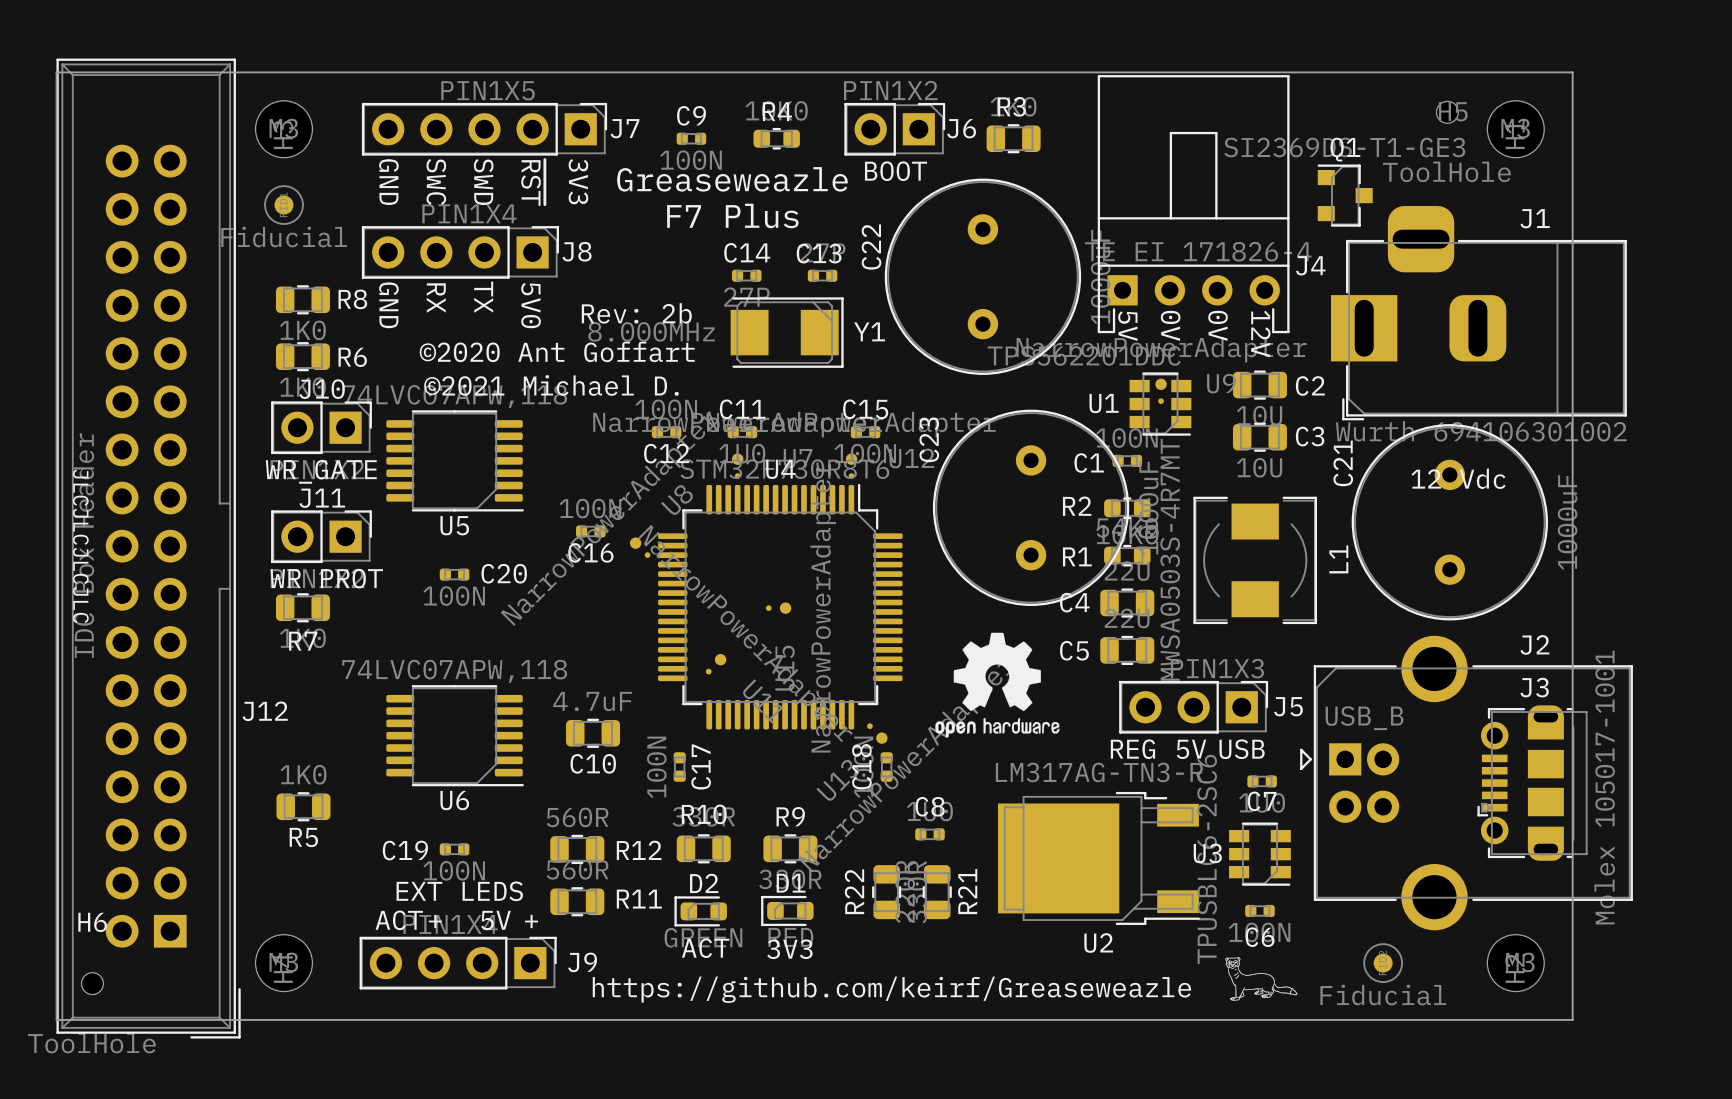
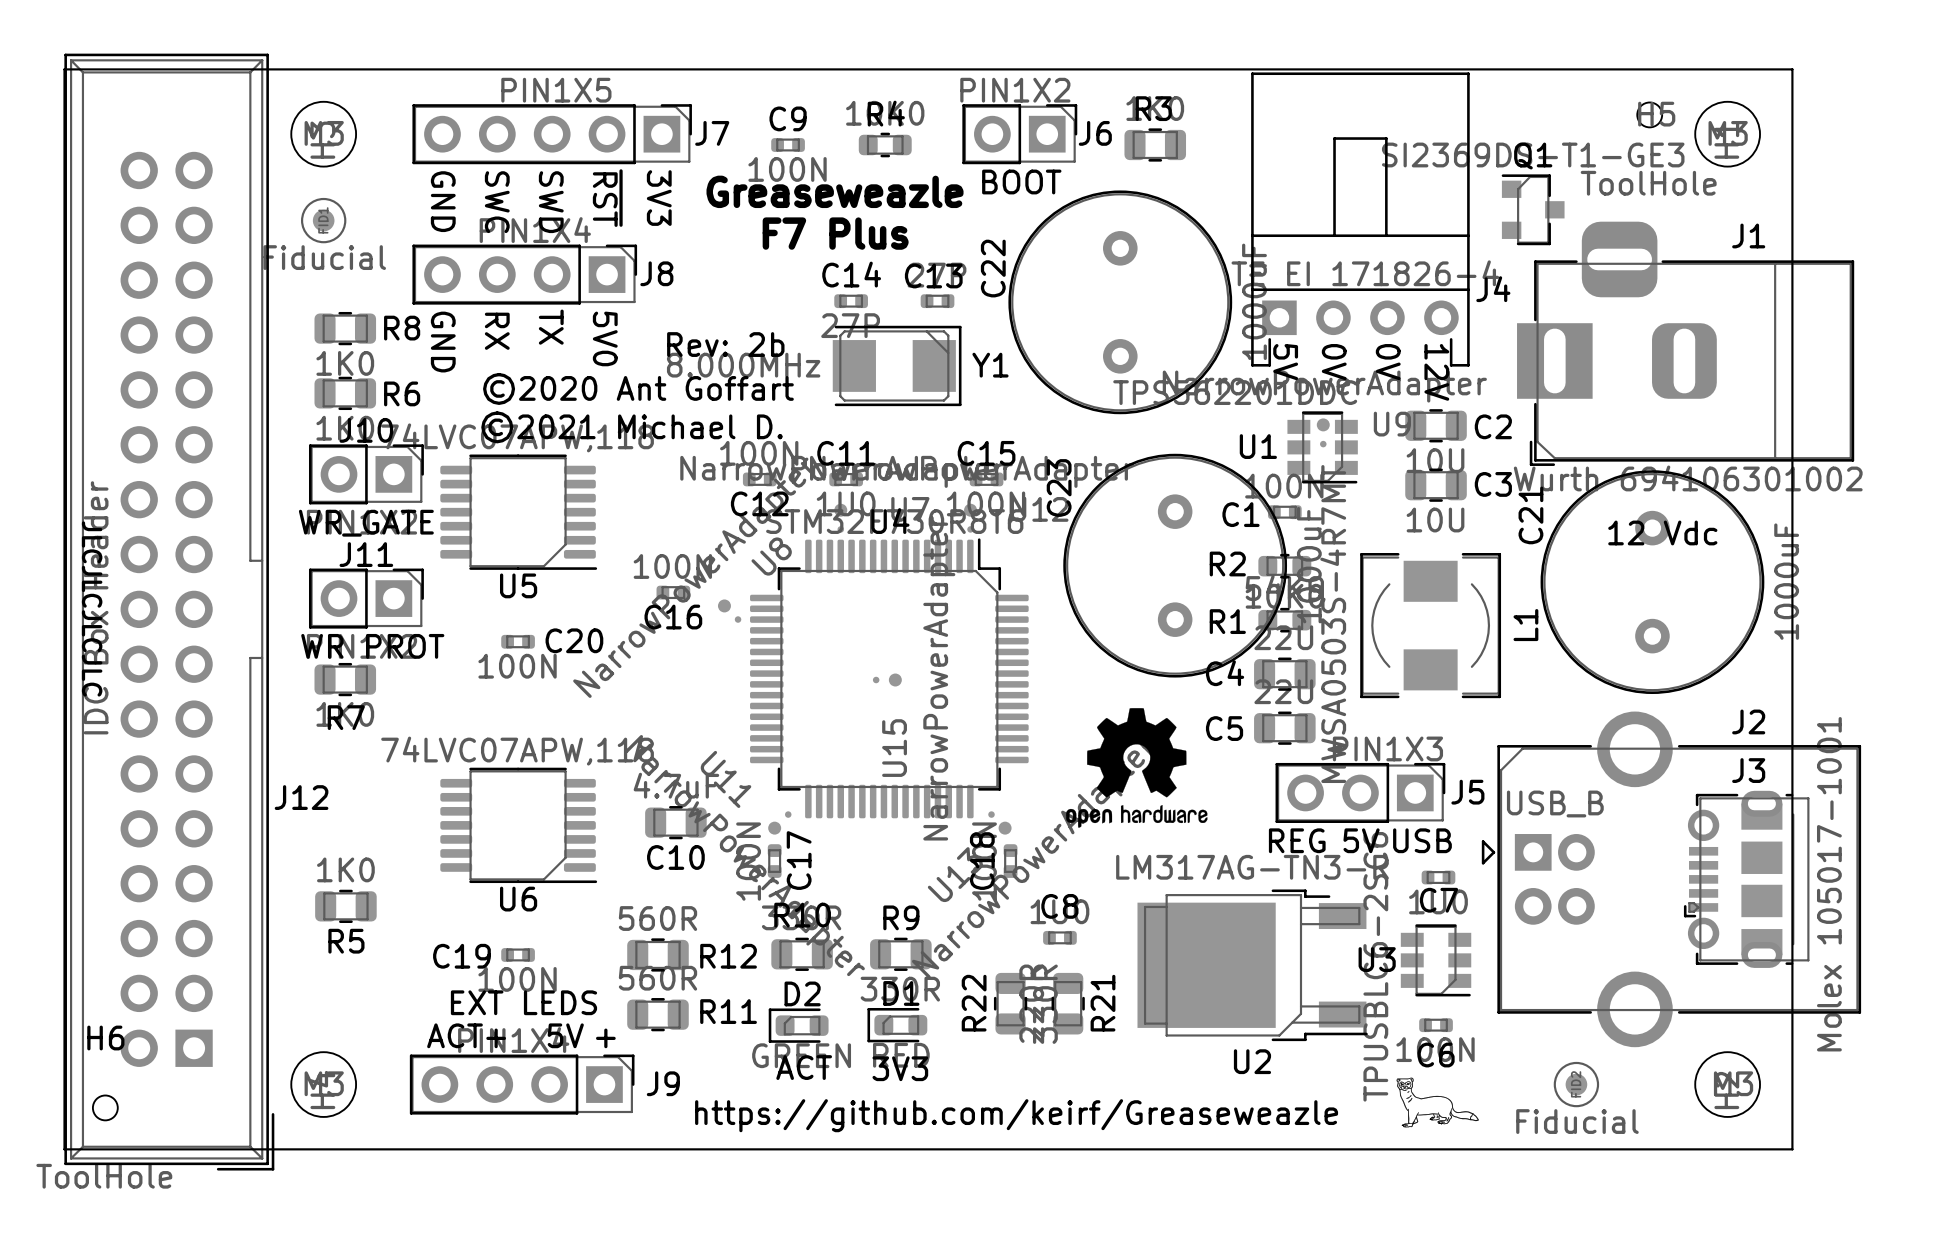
U11 rotation: 0° (716, 664) -> 180° (779, 822)
U11 position: (716, 664) -> (779, 822)

